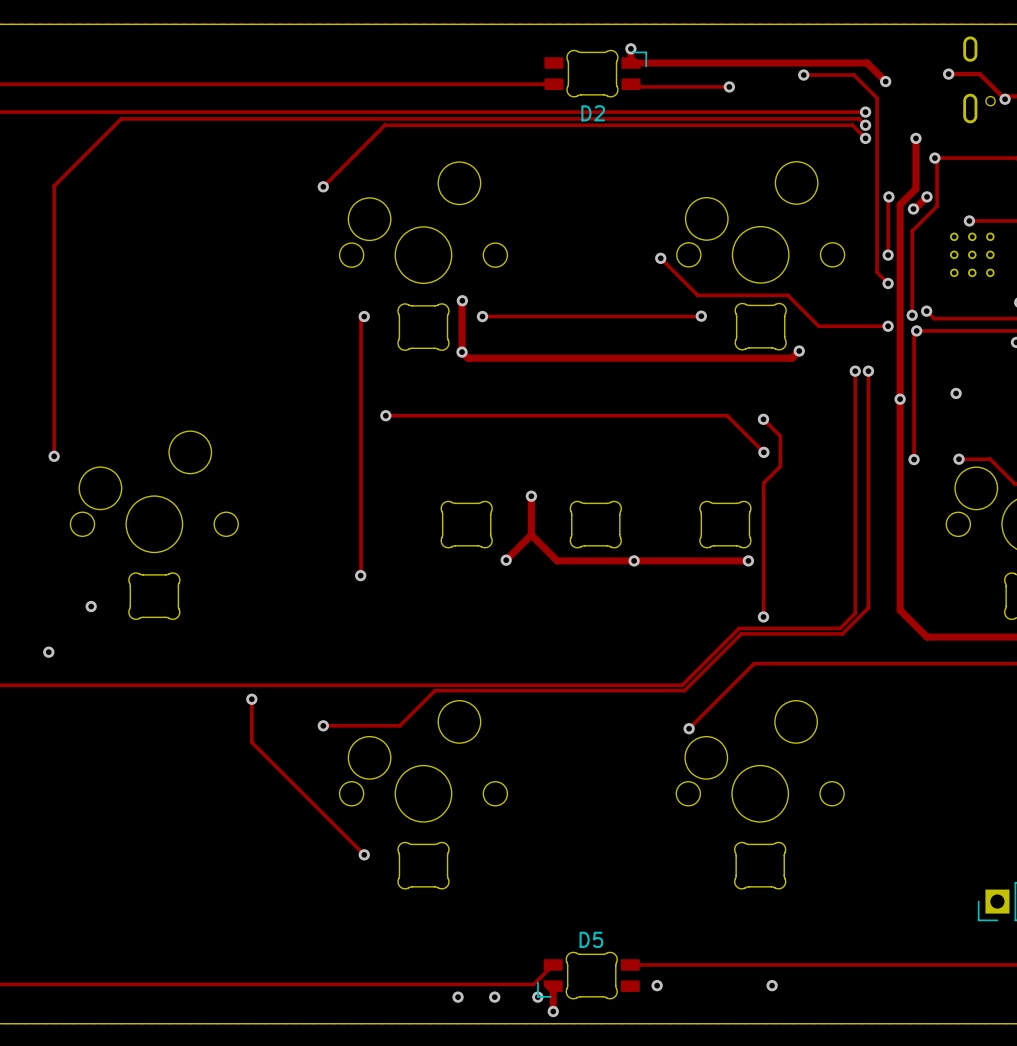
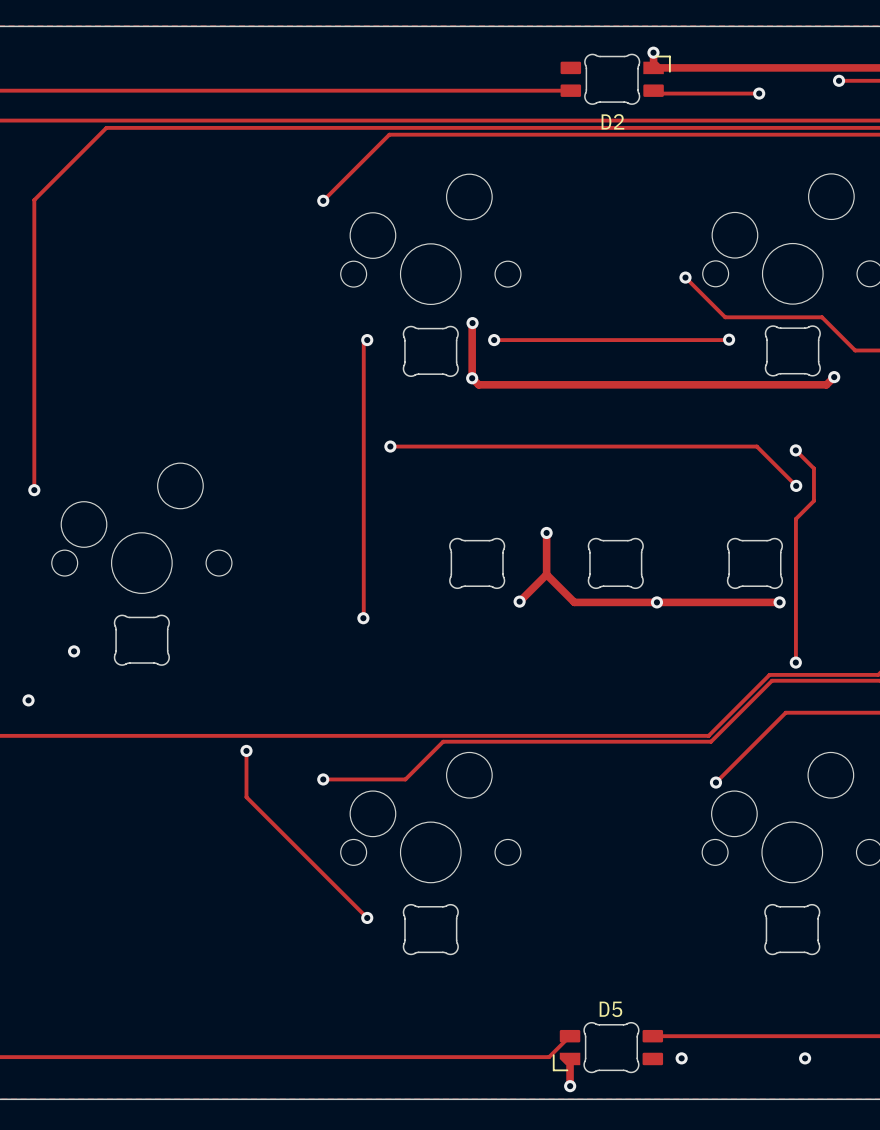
via: (458, 997) -> none
via: (494, 997) -> none
via: (537, 997) -> none

